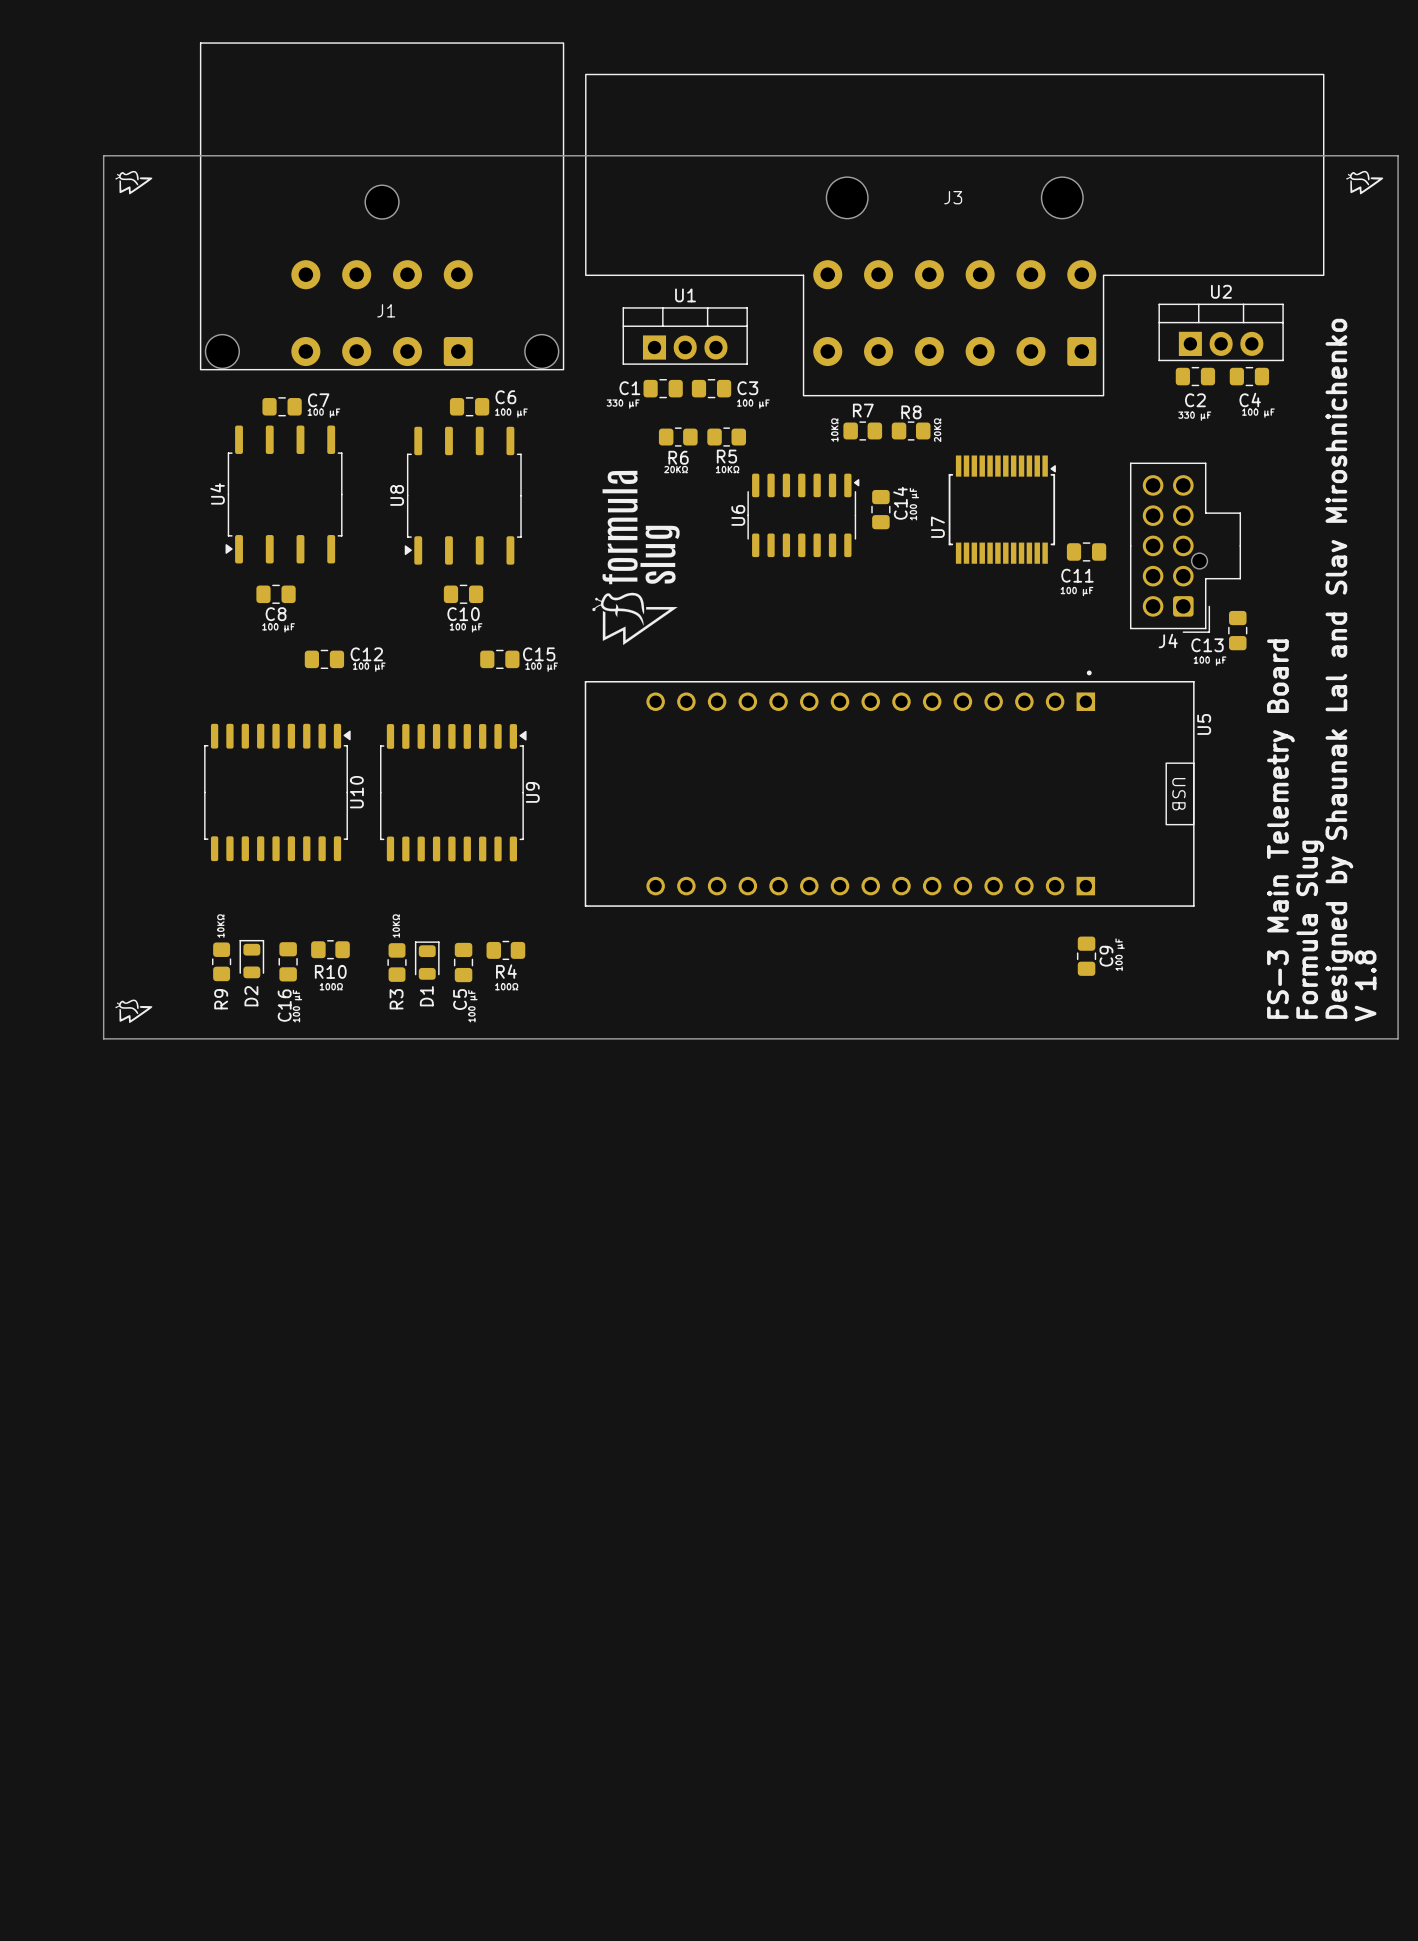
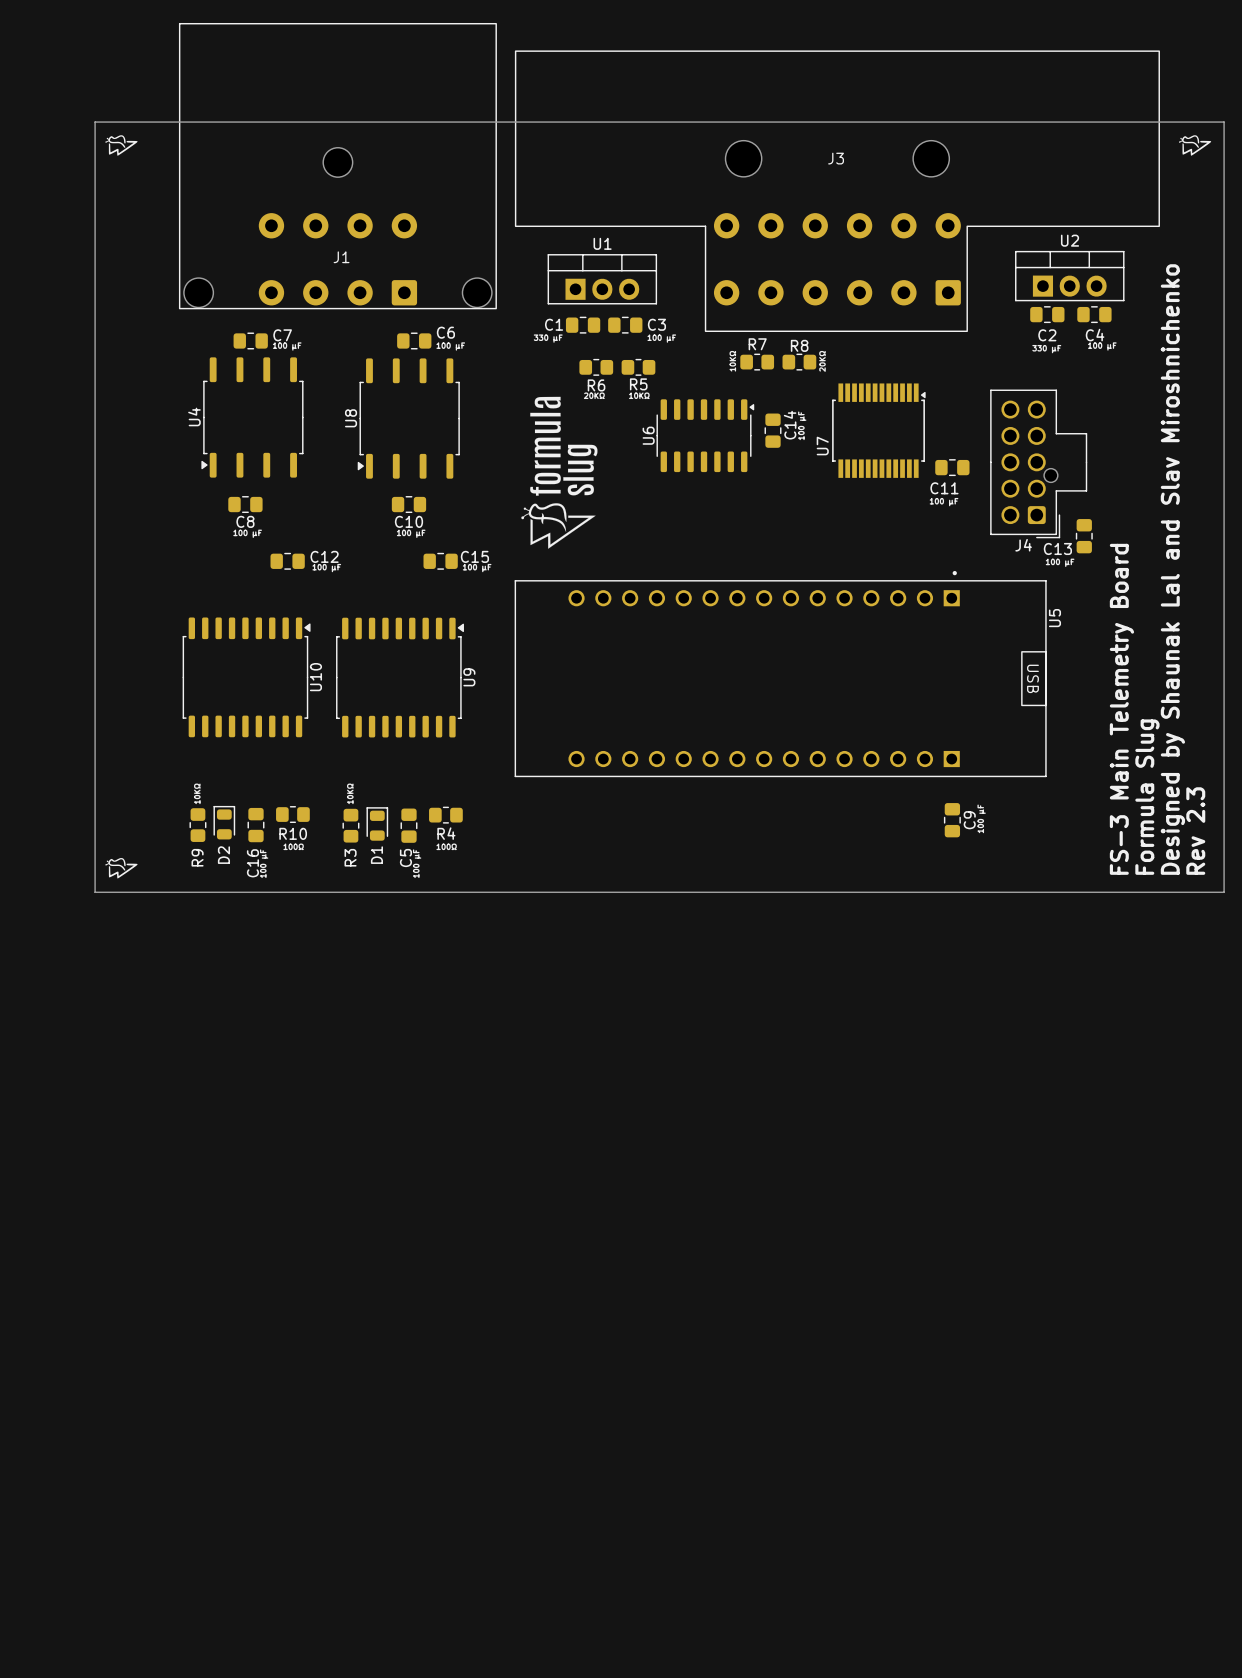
text: V 1.8 (1365, 985) -> Rev 2.3 (1195, 831)

